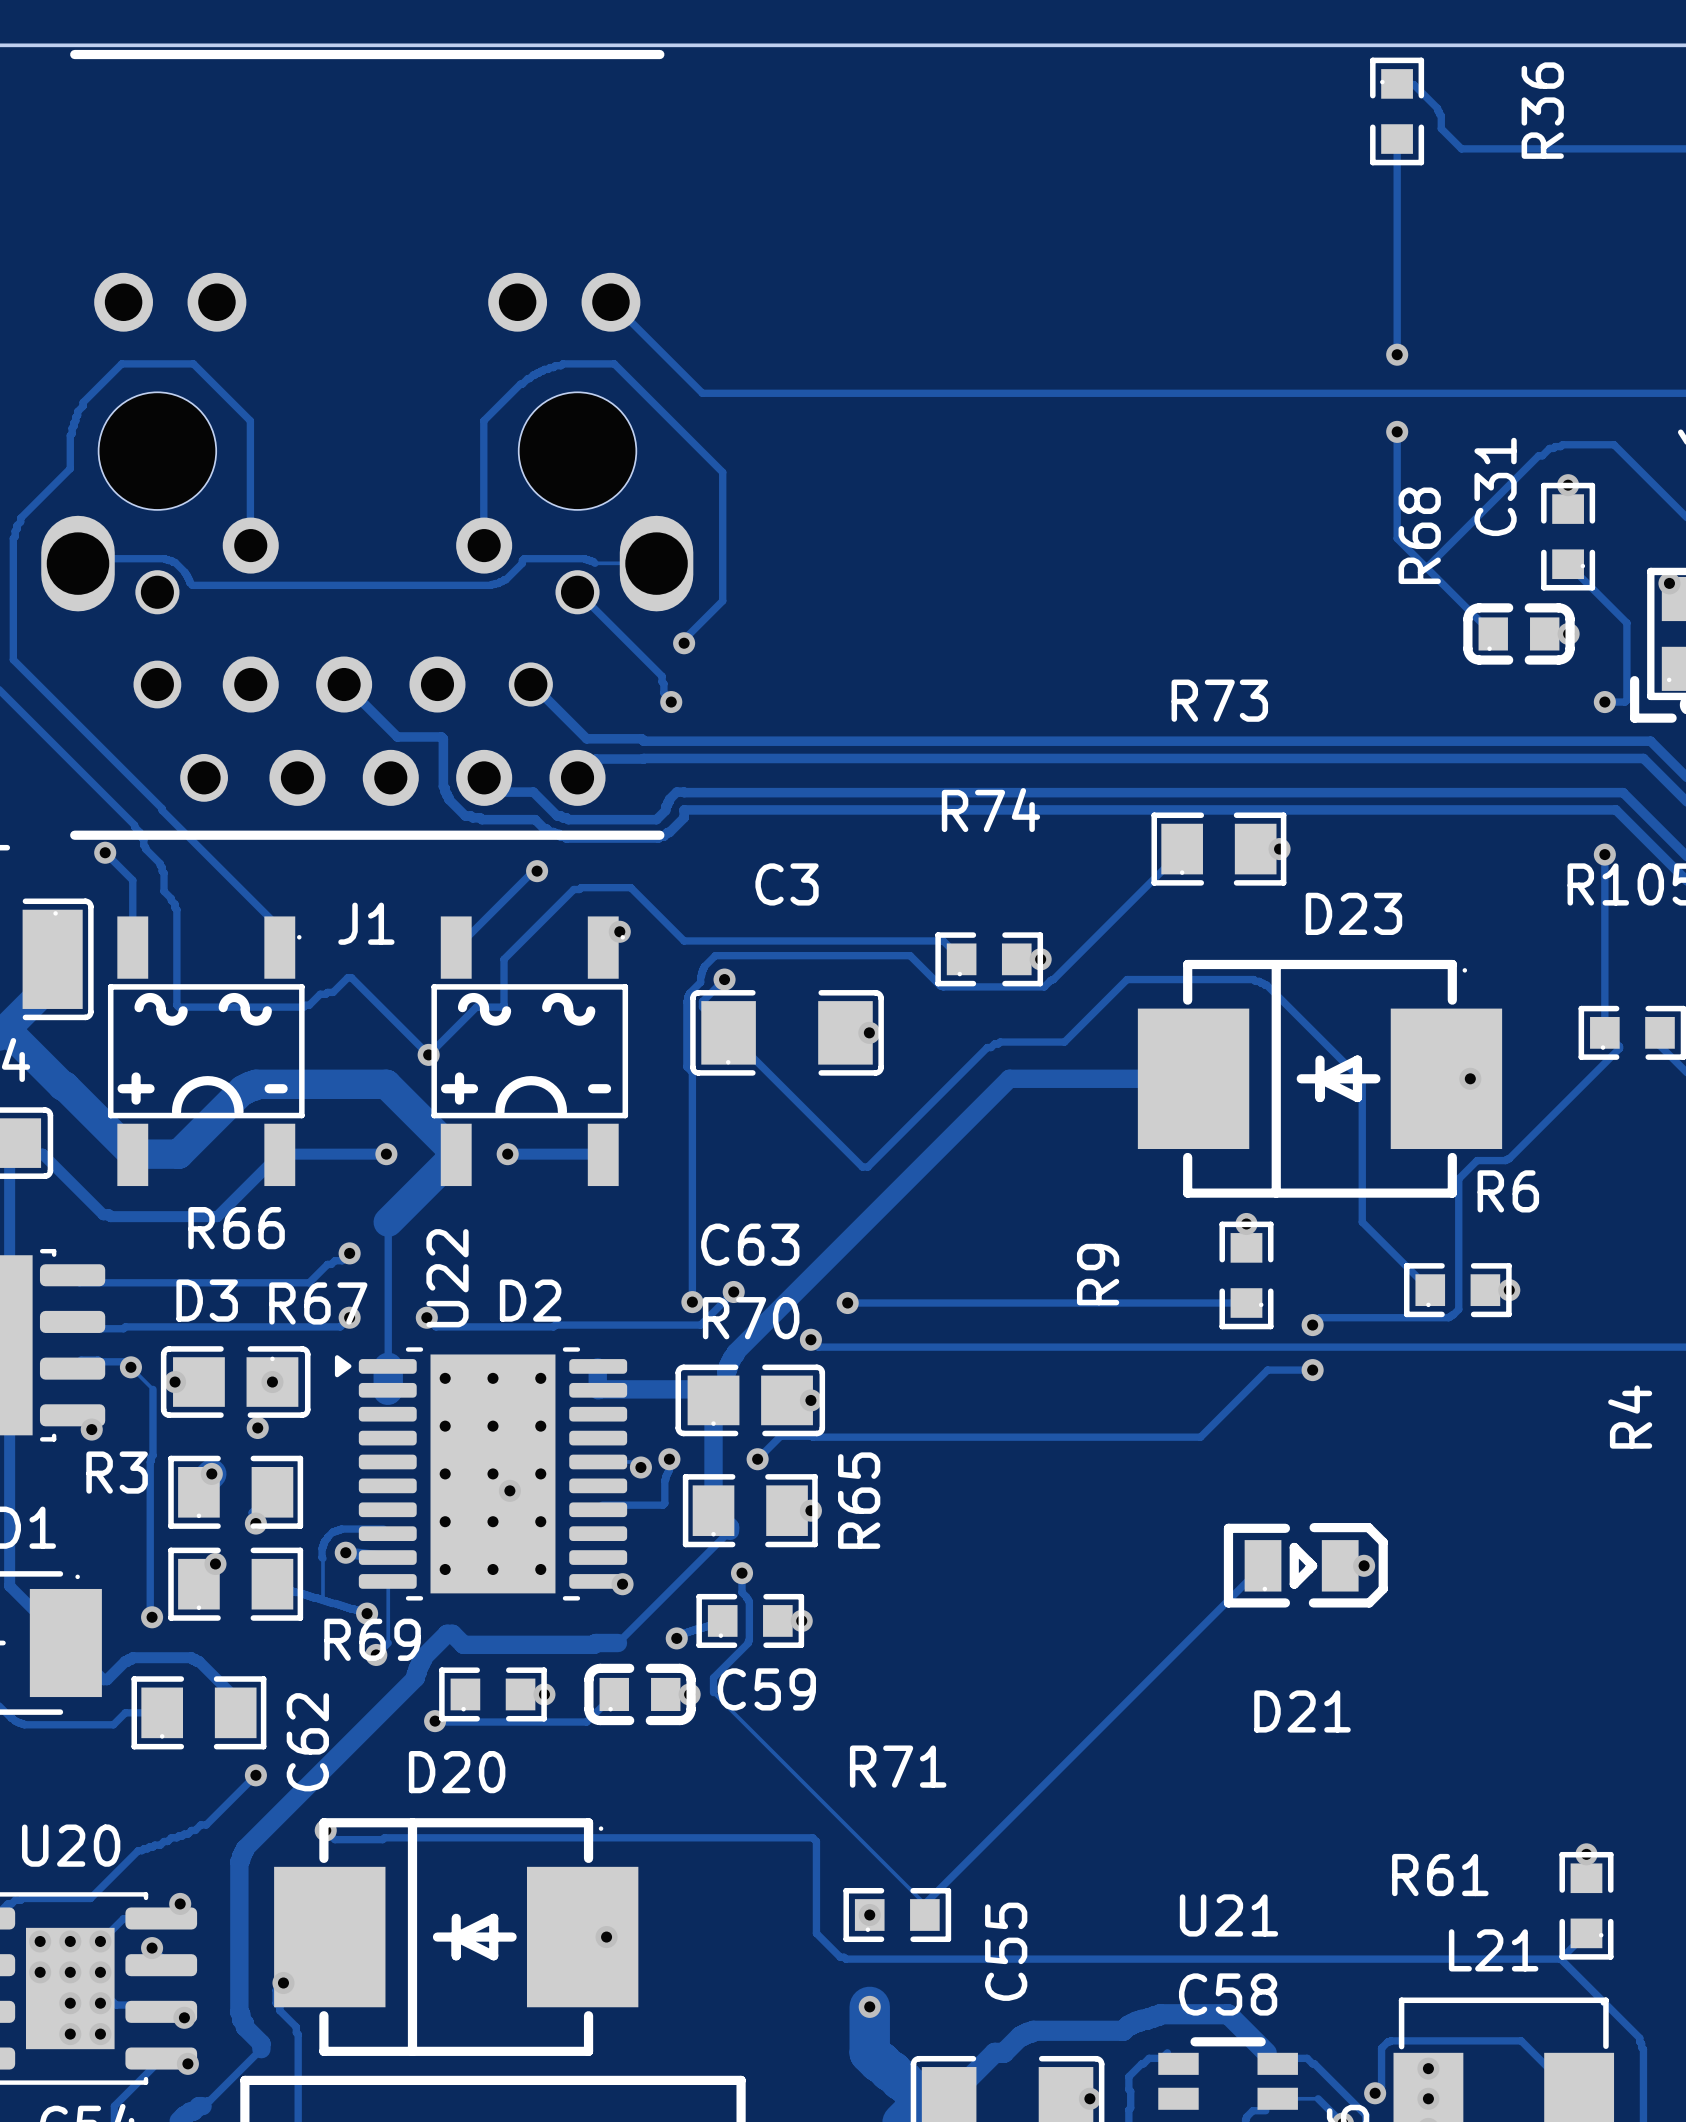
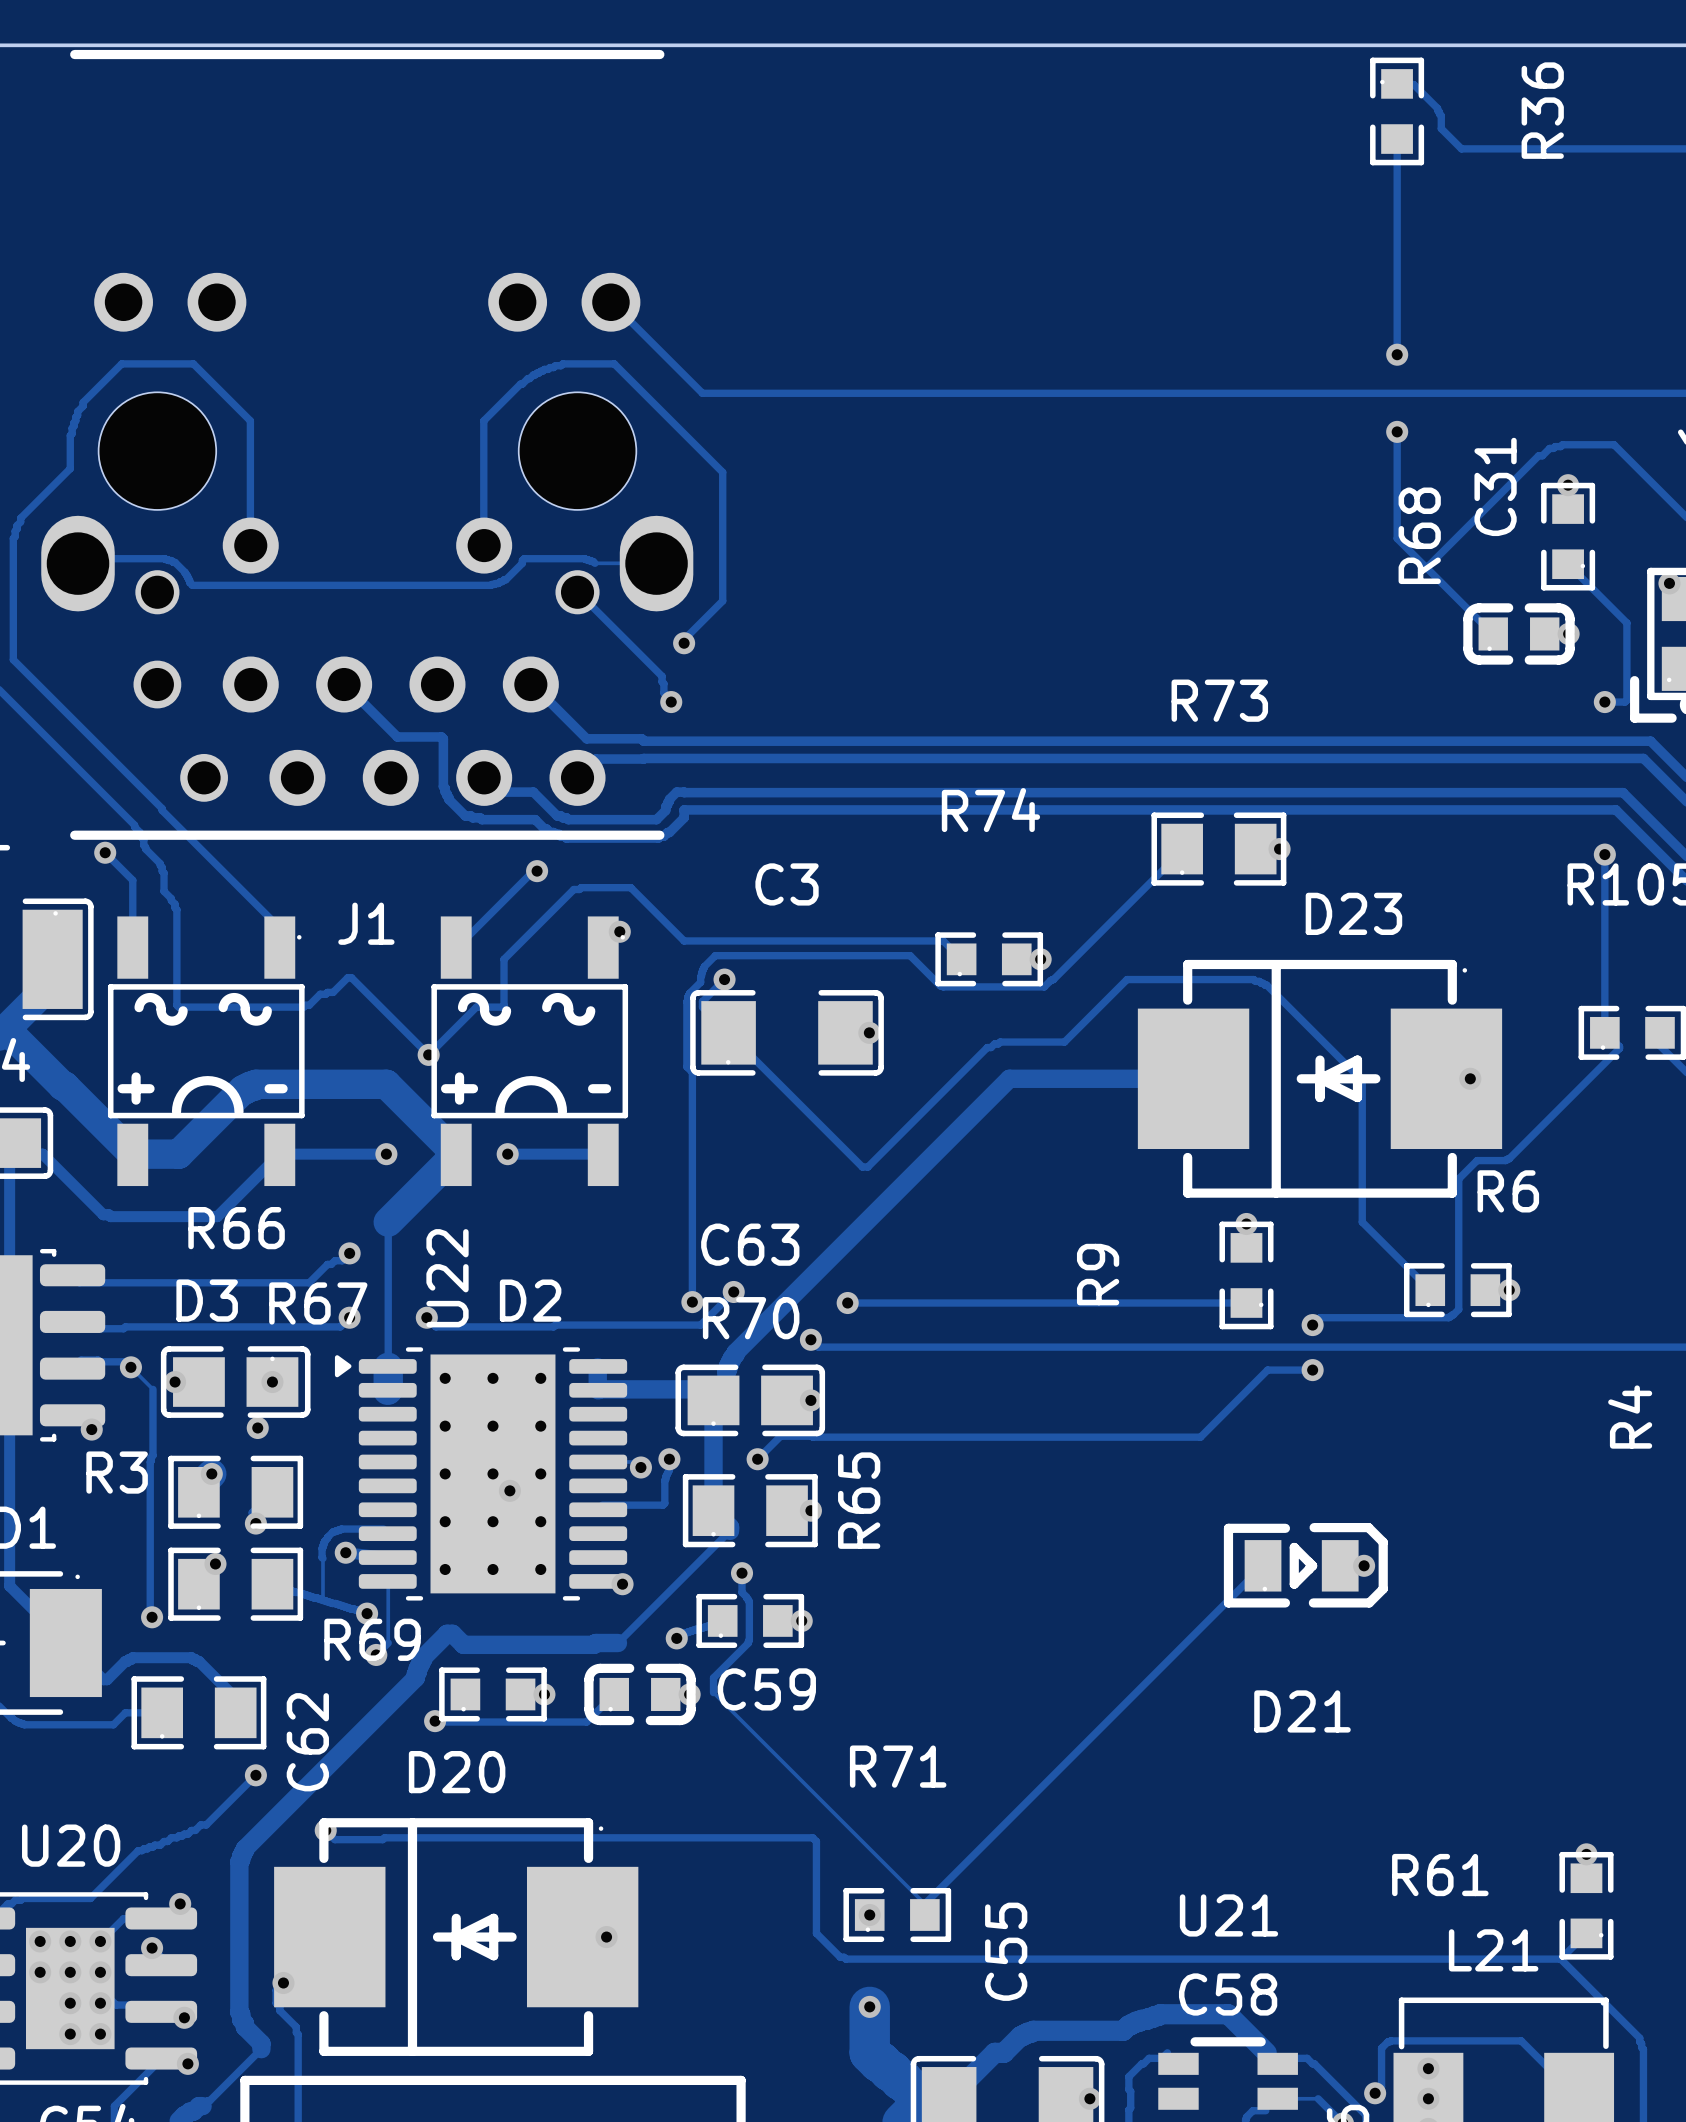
J1 footprint: [41, 49, 694, 840] -> [41, 49, 694, 840]

